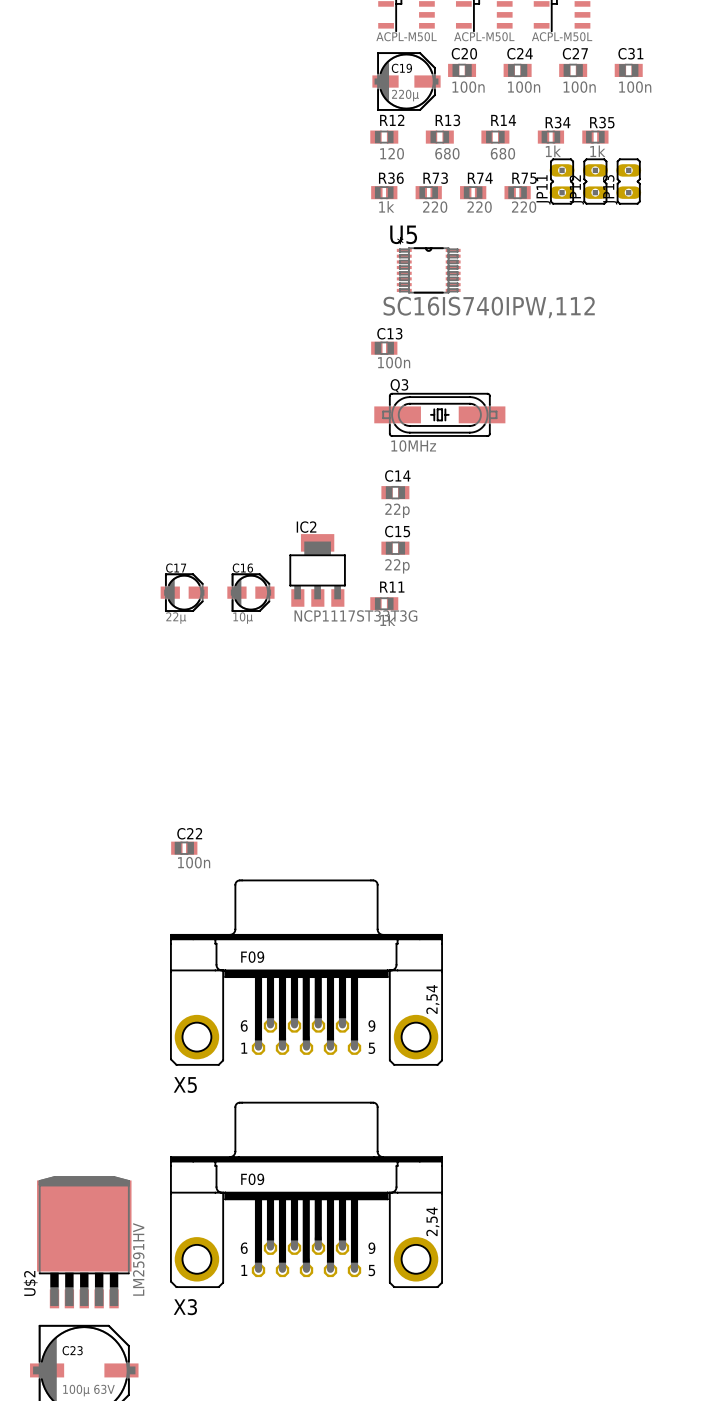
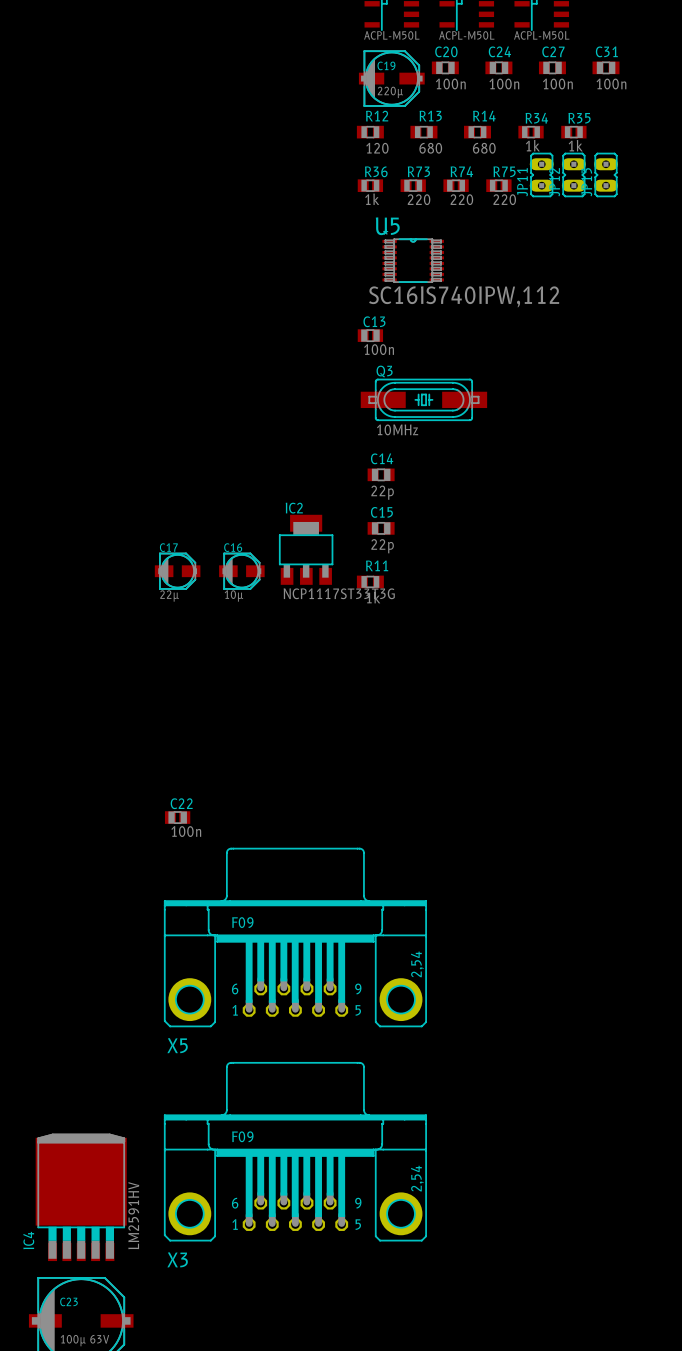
U$2 name: U$2 (30, 1283) -> IC4 (28, 1240)

